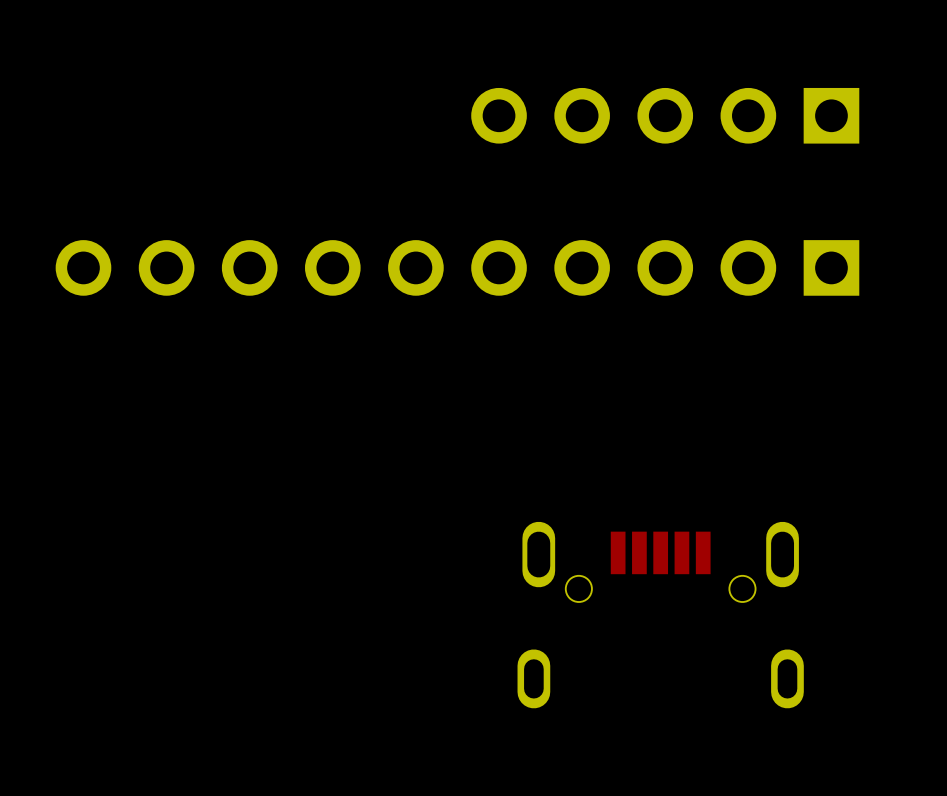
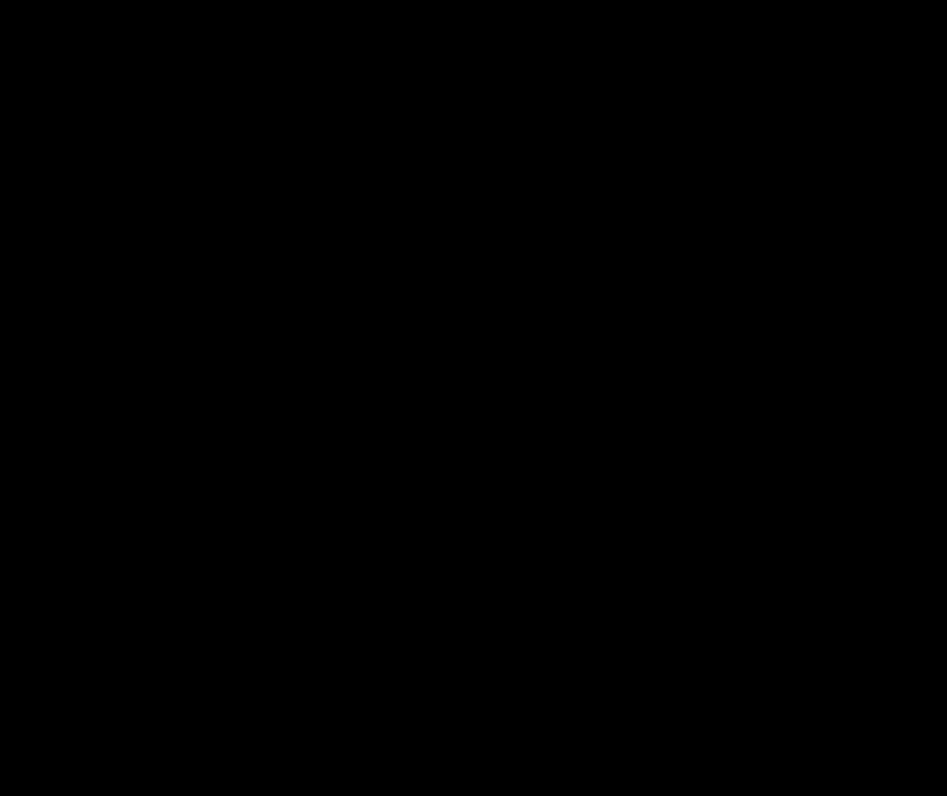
part: (665, 115) -> none
part: (457, 267) -> none
part: (660, 615) -> none

